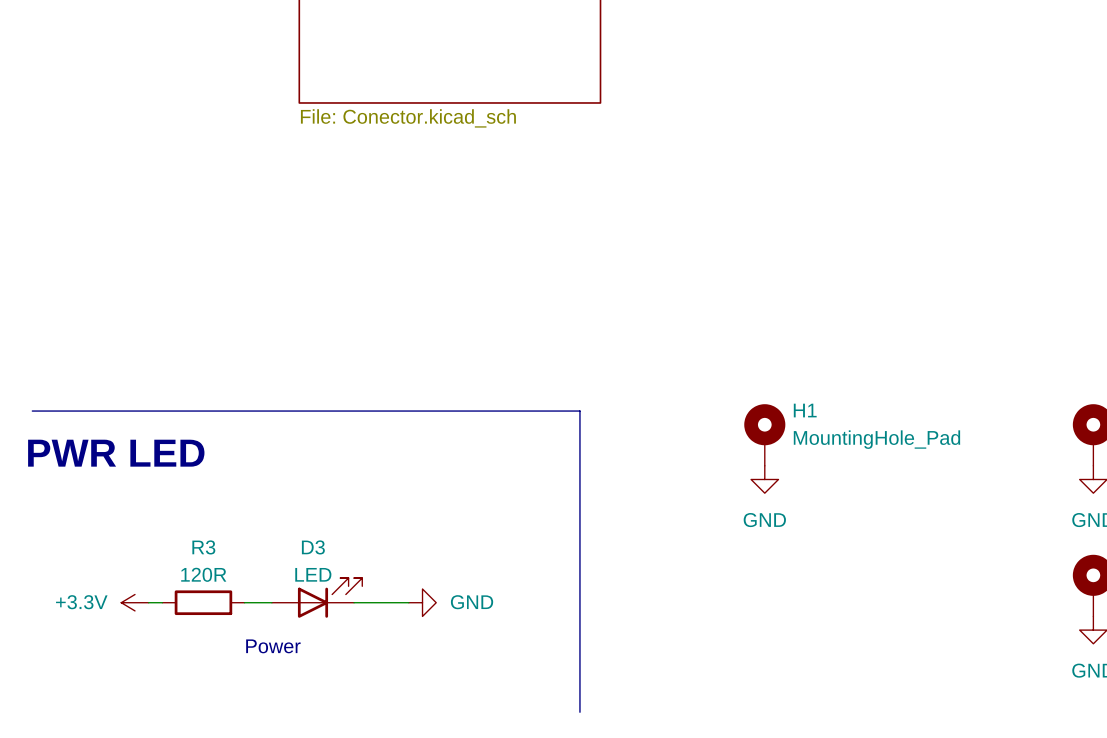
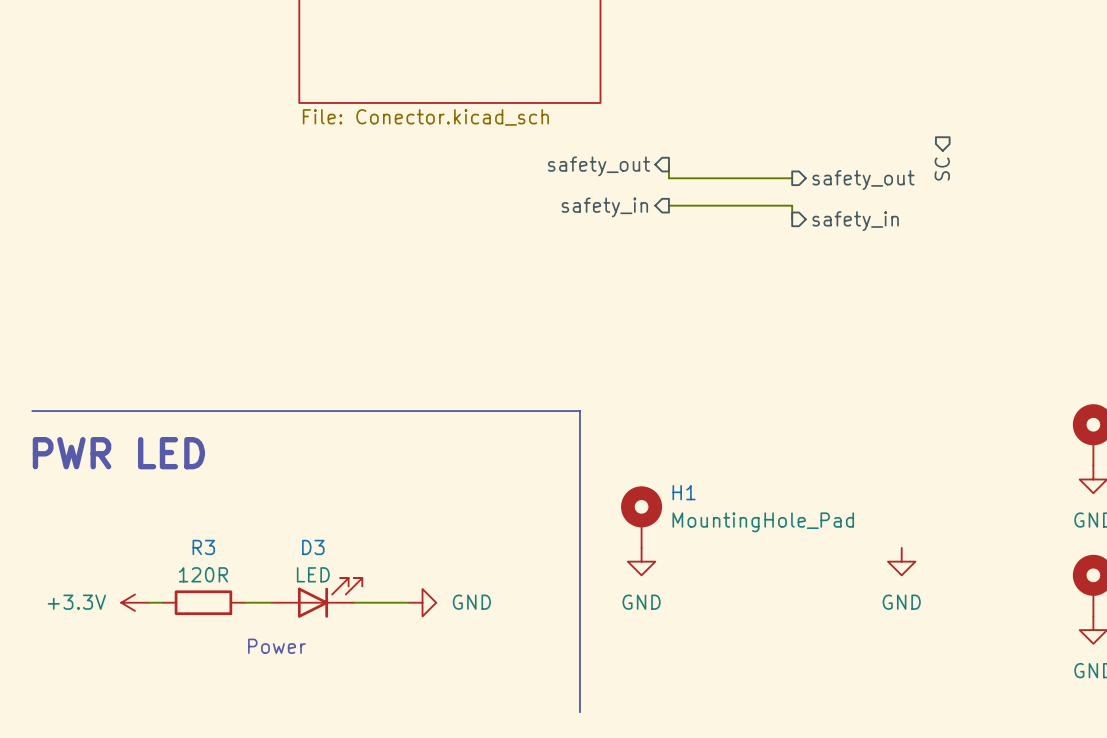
wire: none -> (668, 164) (668, 178) (792, 178)
sheet pin: none -> safety_out (598, 166)
sheet pin: none -> SC (942, 169)
sheet pin: none -> safety_out (863, 180)
wire: none -> (668, 205) (792, 205) (792, 219)
sheet pin: none -> safety_in (604, 207)
sheet pin: none -> safety_in (855, 221)
H1 position: (764, 434) -> (641, 517)
power symbol: GND (764, 479) -> none
power symbol: none -> GND (641, 561)
power symbol: none -> GND (901, 561)

